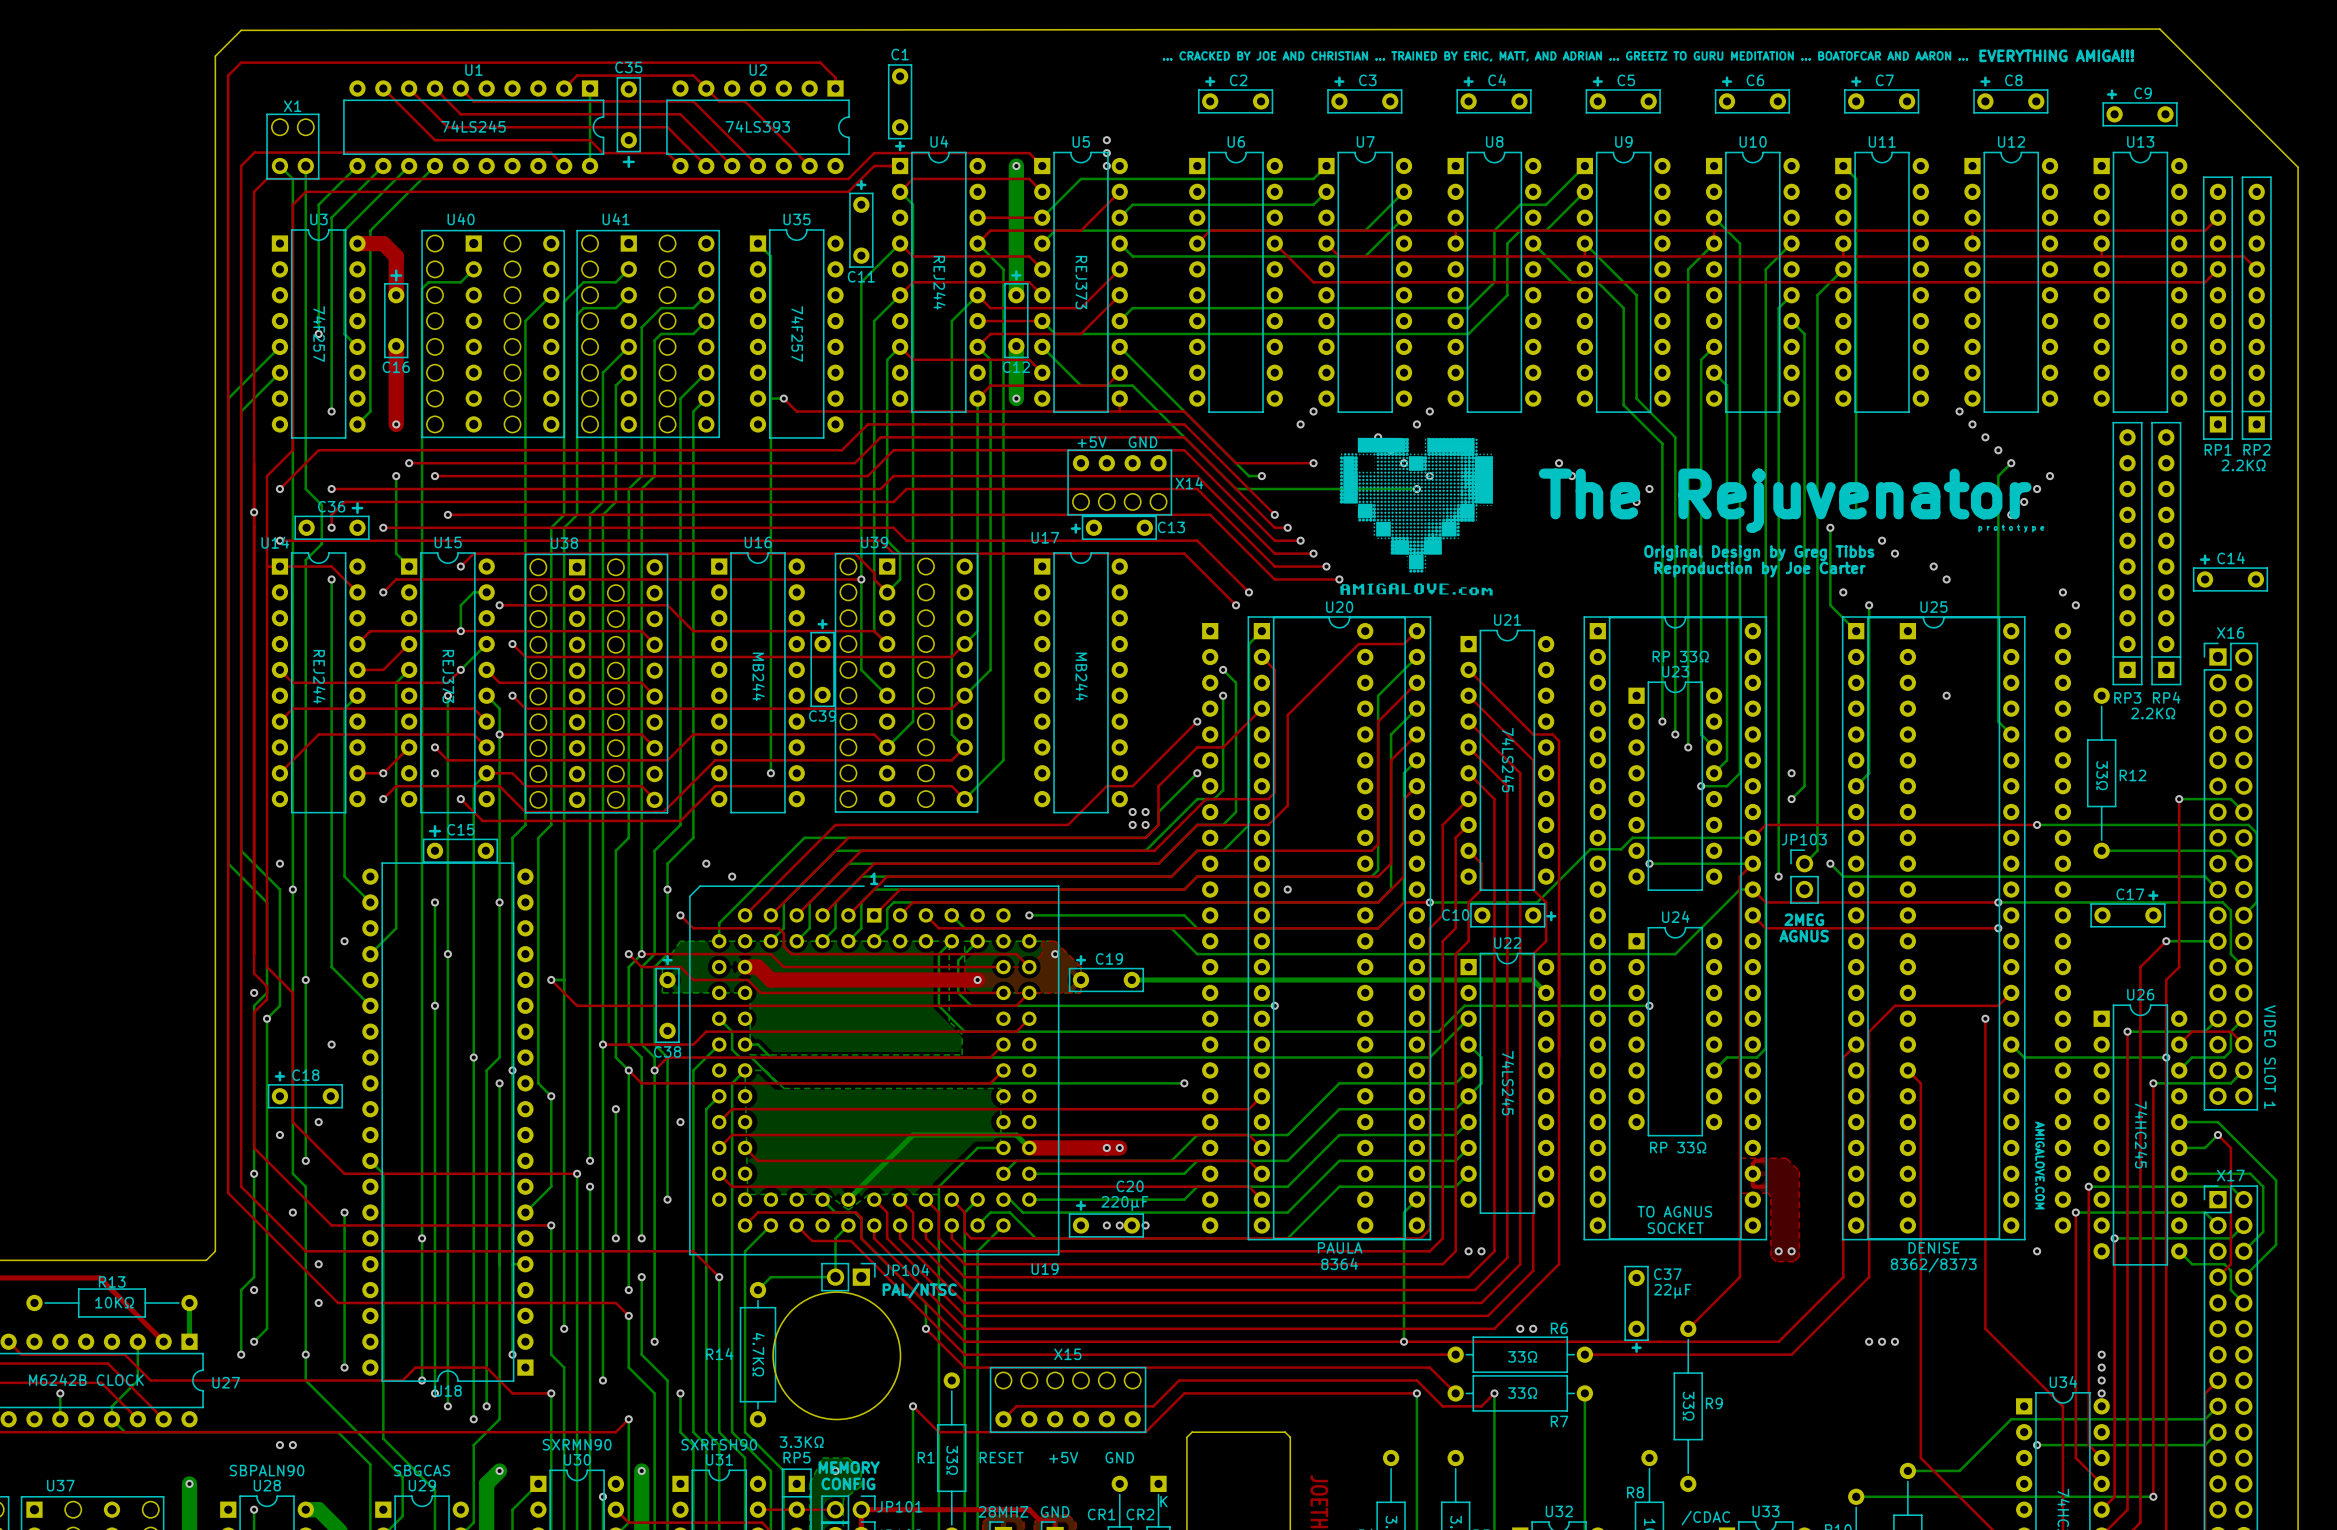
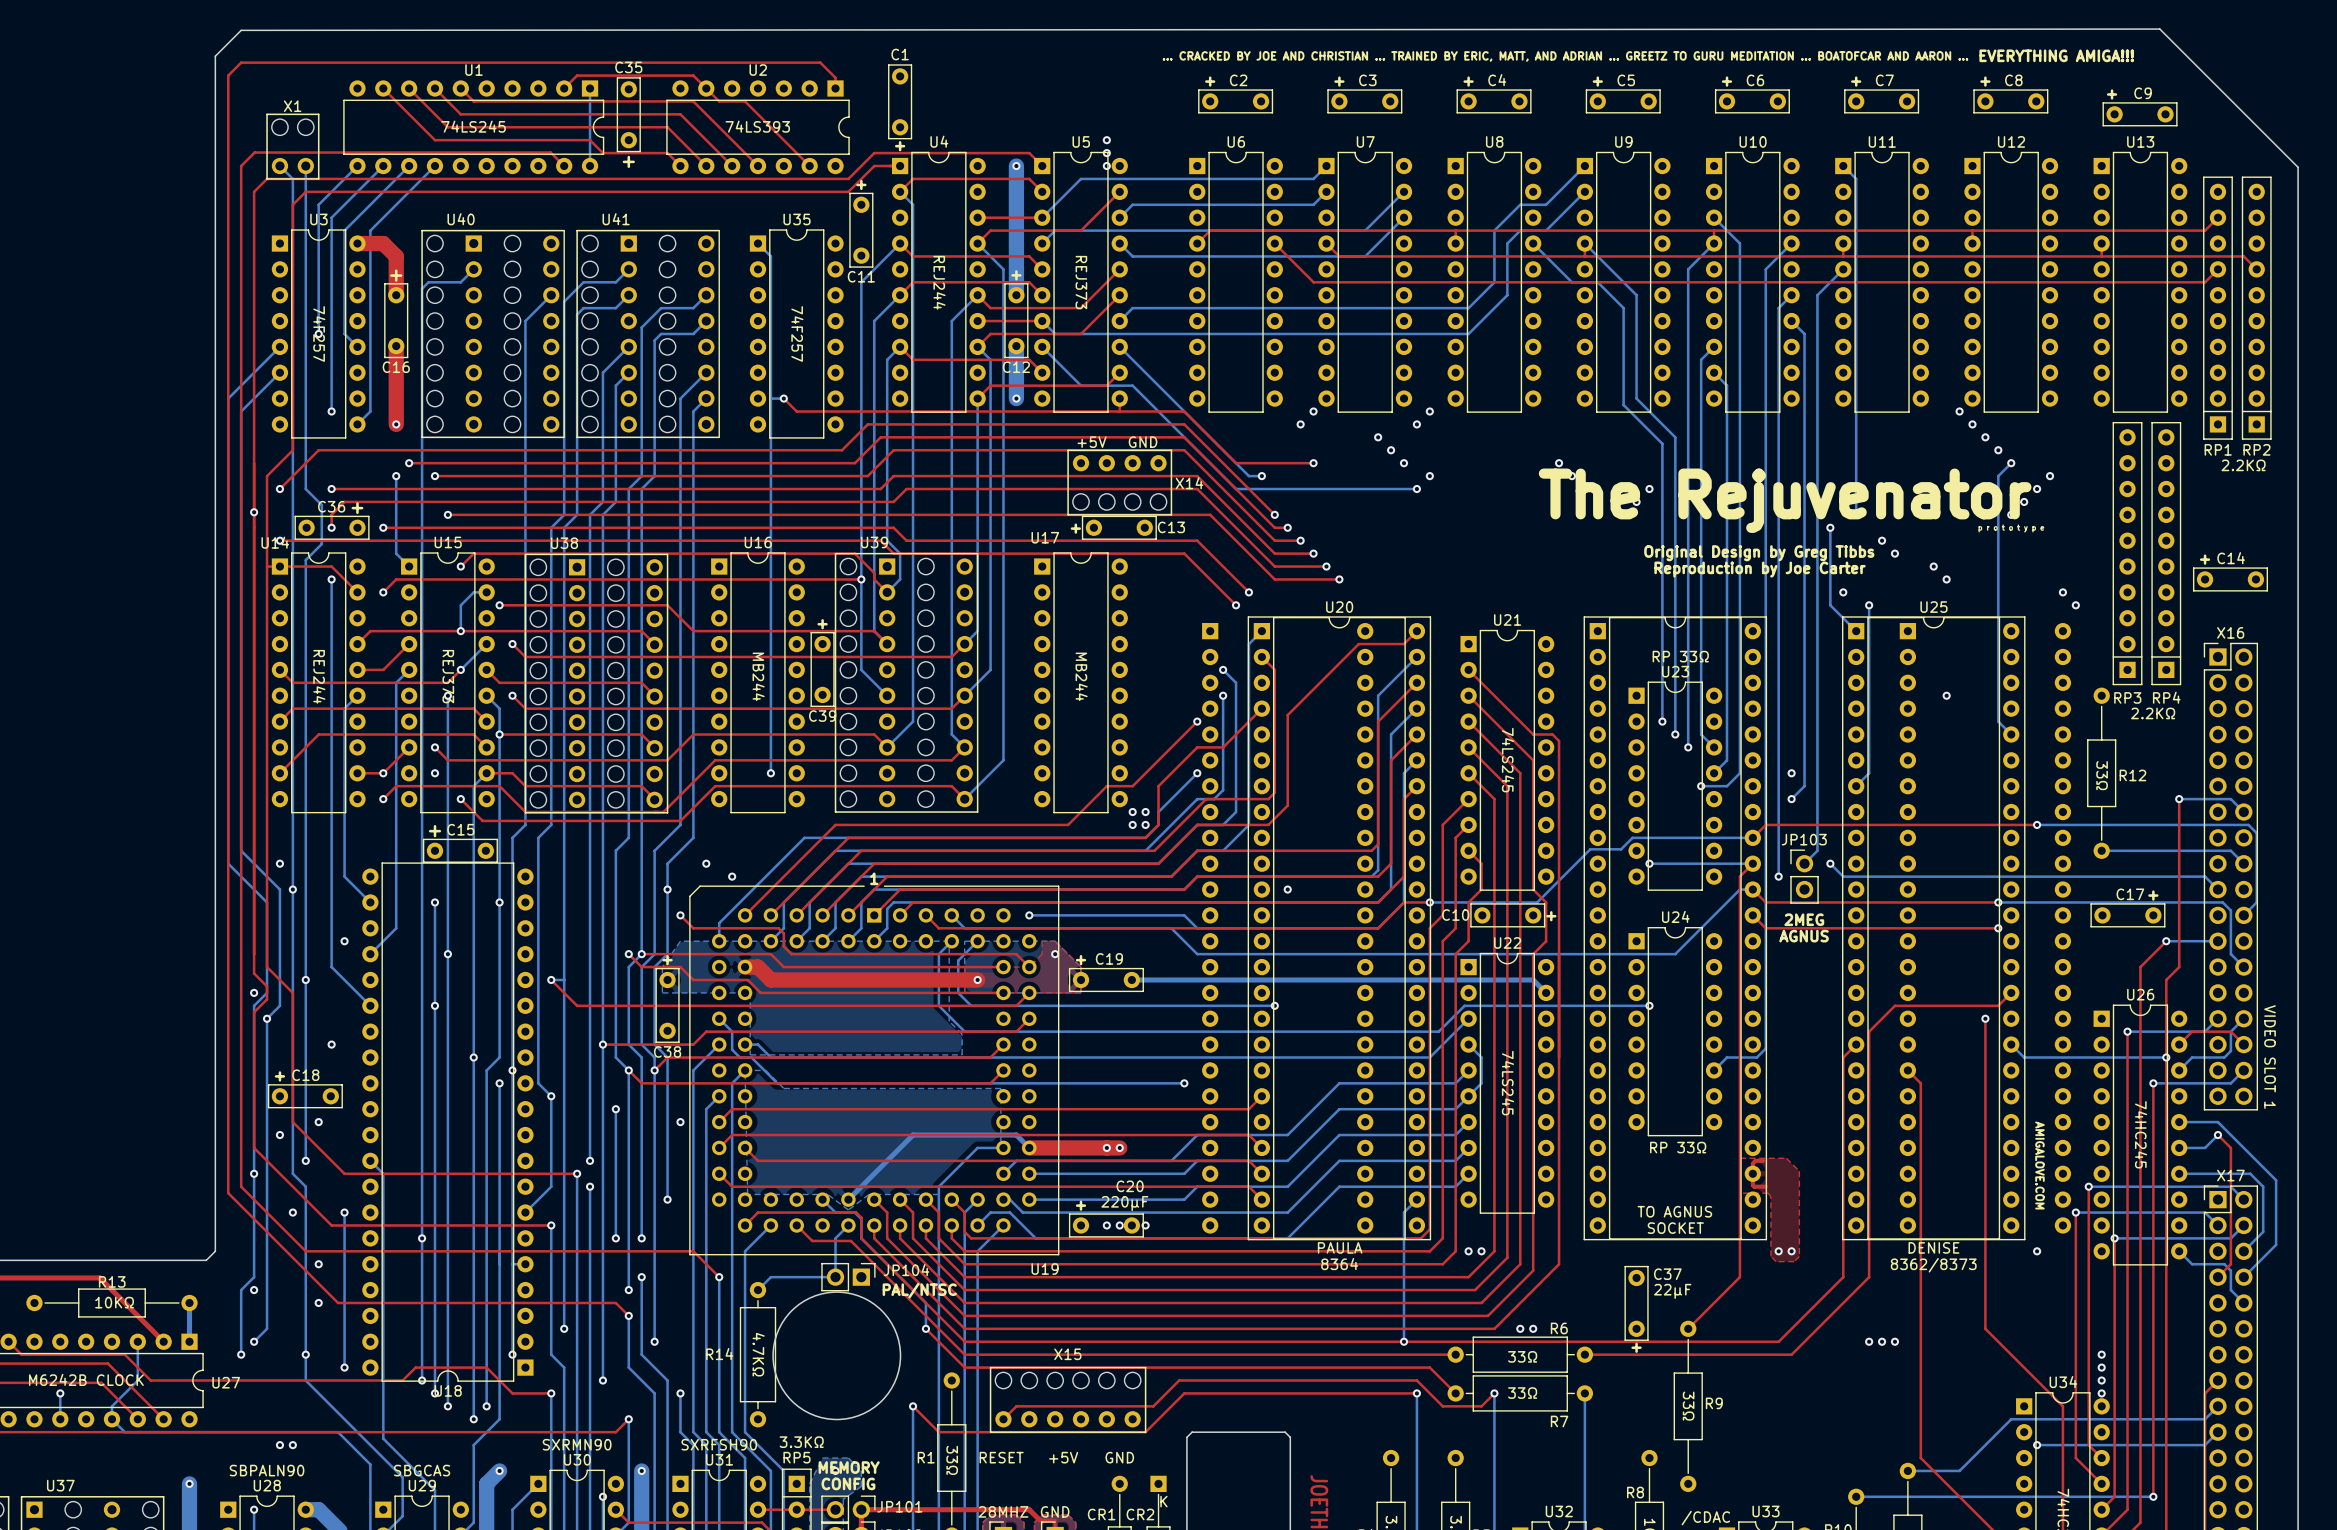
drawing: [1339, 437, 1496, 596] -> none

